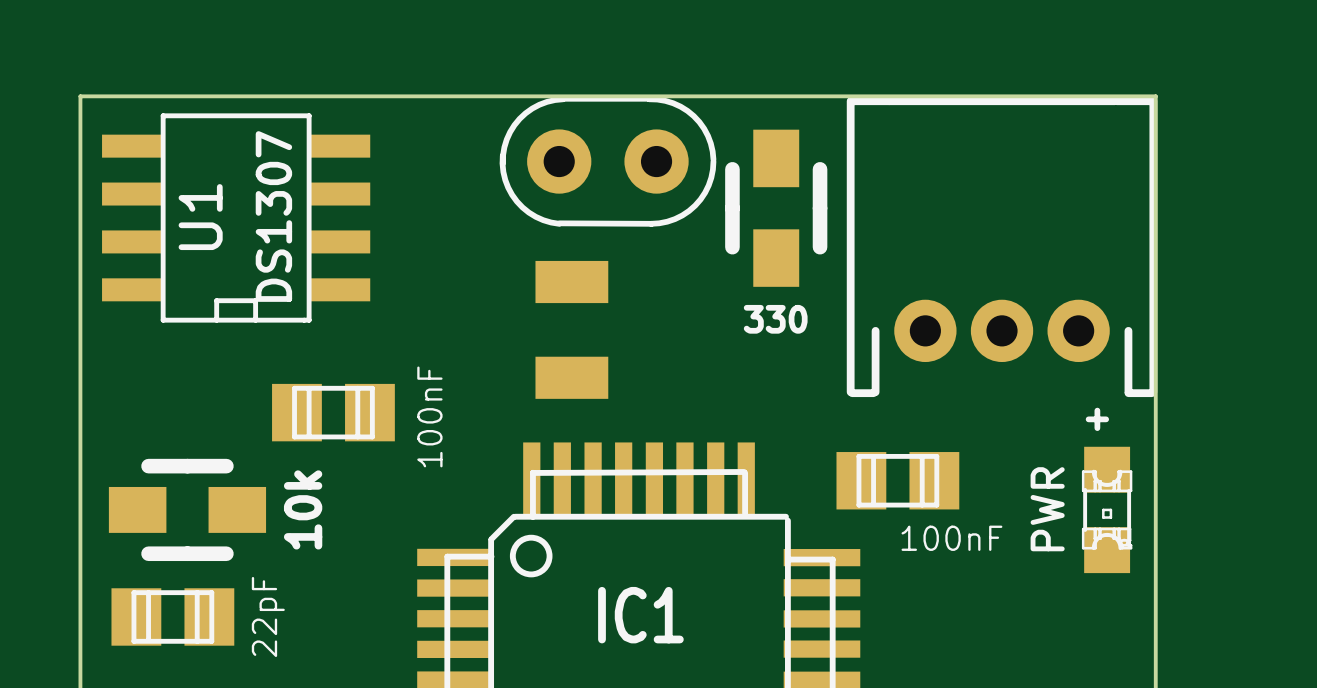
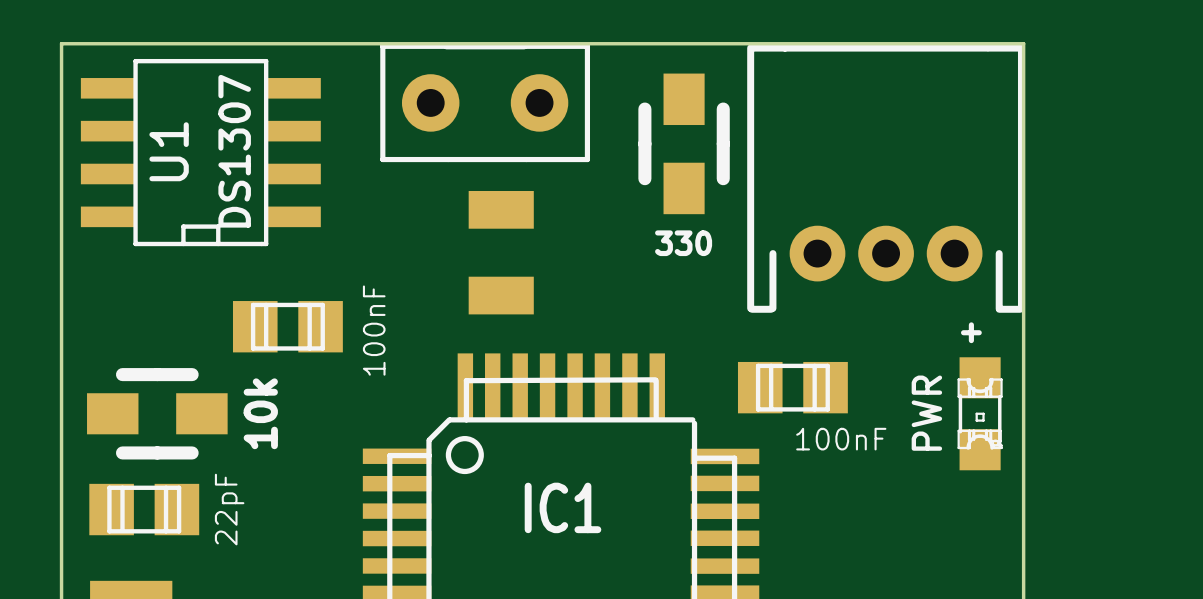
part: (608, 161) -> none
part: none -> (485, 102)

